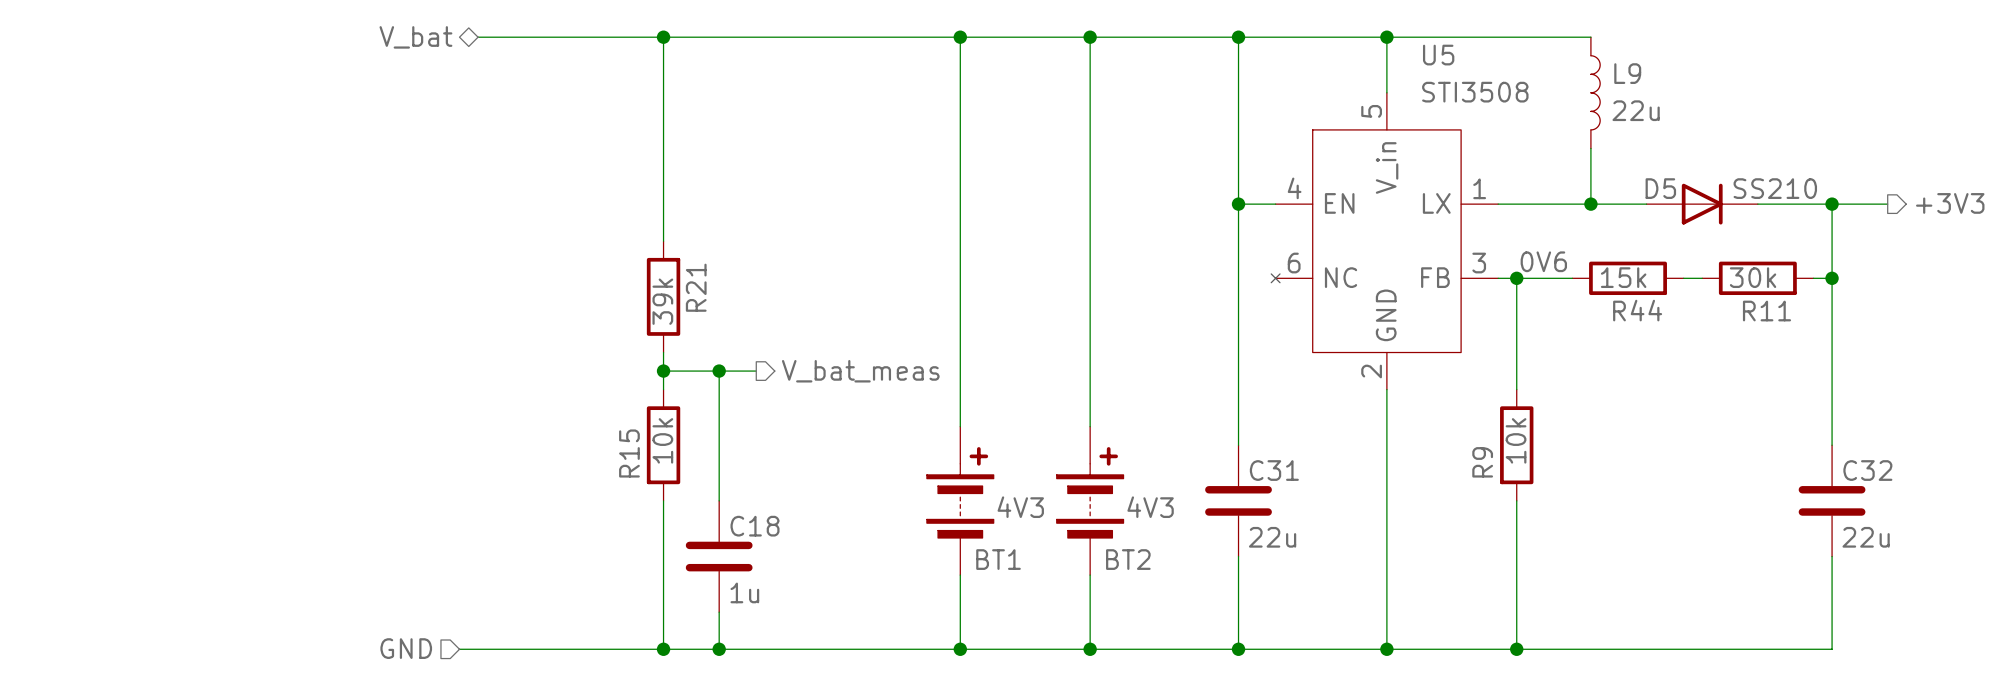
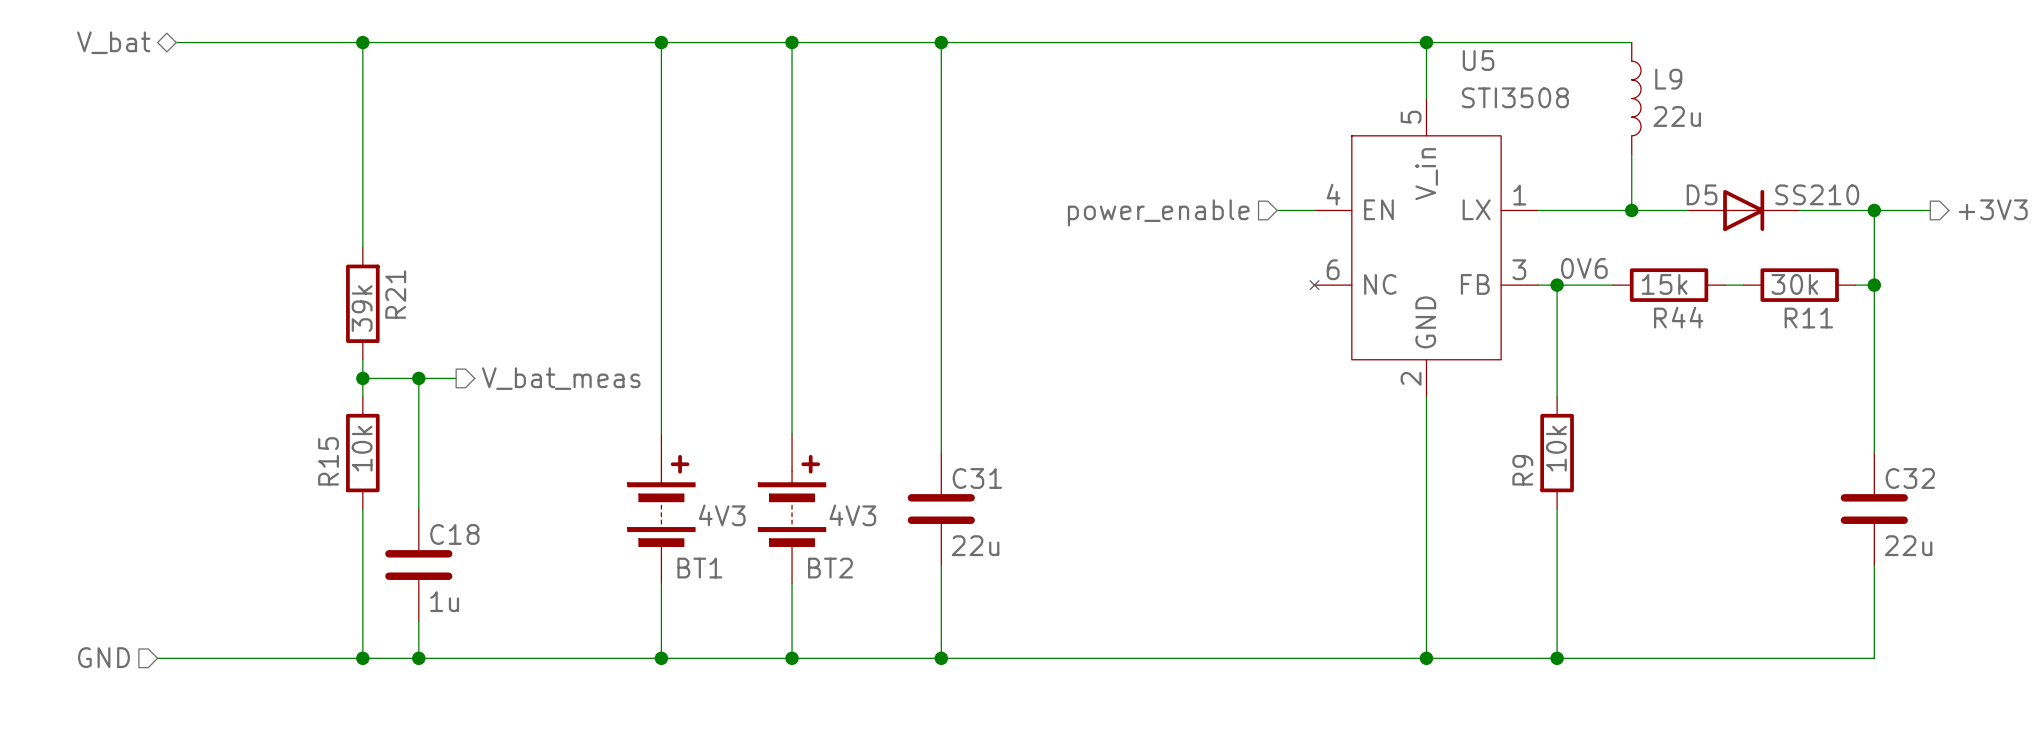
wire: none -> (176, 42) (512, 42)
junction: none -> (362, 42)
hierarchical label position: V_bat (415, 37) -> V_bat (113, 42)
wire: (663, 37) (663, 241) -> (362, 42) (362, 247)
junction position: (663, 37) -> (661, 42)
junction: none -> (792, 42)
wire: (960, 37) (960, 426) -> (661, 42) (661, 434)
junction position: (960, 37) -> (941, 42)
wire: (1090, 37) (1090, 426) -> (792, 42) (792, 434)
junction: (1090, 37) -> none
wire: (1238, 37) (1238, 445) -> (941, 42) (941, 453)
junction: (1238, 37) -> none
junction: (1238, 204) -> none
hierarchical label: none -> power_enable (1158, 212)
R21 position: (663, 296) -> (362, 303)
wire: (663, 352) (663, 389) -> (362, 359) (362, 397)
junction: none -> (362, 378)
junction: none -> (418, 378)
wire: (663, 371) (756, 371) -> (362, 378) (456, 378)
junction: (663, 371) -> none
wire: (719, 371) (719, 500) -> (418, 378) (418, 509)
junction: (719, 371) -> none
hierarchical label position: V_bat_meas (860, 371) -> V_bat_meas (561, 378)
R15 position: (663, 445) -> (362, 453)
wire: (663, 500) (663, 649) -> (362, 509) (362, 658)
BT1 position: (960, 500) -> (661, 509)
BT2 position: (1090, 500) -> (792, 509)
C31 position: (1238, 500) -> (941, 509)
C18 position: (719, 556) -> (418, 565)
wire: (1238, 556) (1238, 649) -> (941, 565) (941, 658)
wire: (960, 575) (960, 649) -> (661, 583) (661, 658)
wire: (1090, 575) (1090, 649) -> (792, 583) (792, 658)
wire: (719, 612) (719, 649) -> (418, 621) (418, 658)
hierarchical label position: GND (406, 648) -> GND (103, 657)
wire: none -> (157, 658) (493, 658)
junction: none -> (362, 658)
junction: none -> (418, 658)
junction position: (663, 649) -> (661, 658)
junction position: (719, 649) -> (792, 658)
junction position: (960, 649) -> (941, 658)
junction: (1090, 649) -> none
junction: (1238, 649) -> none

